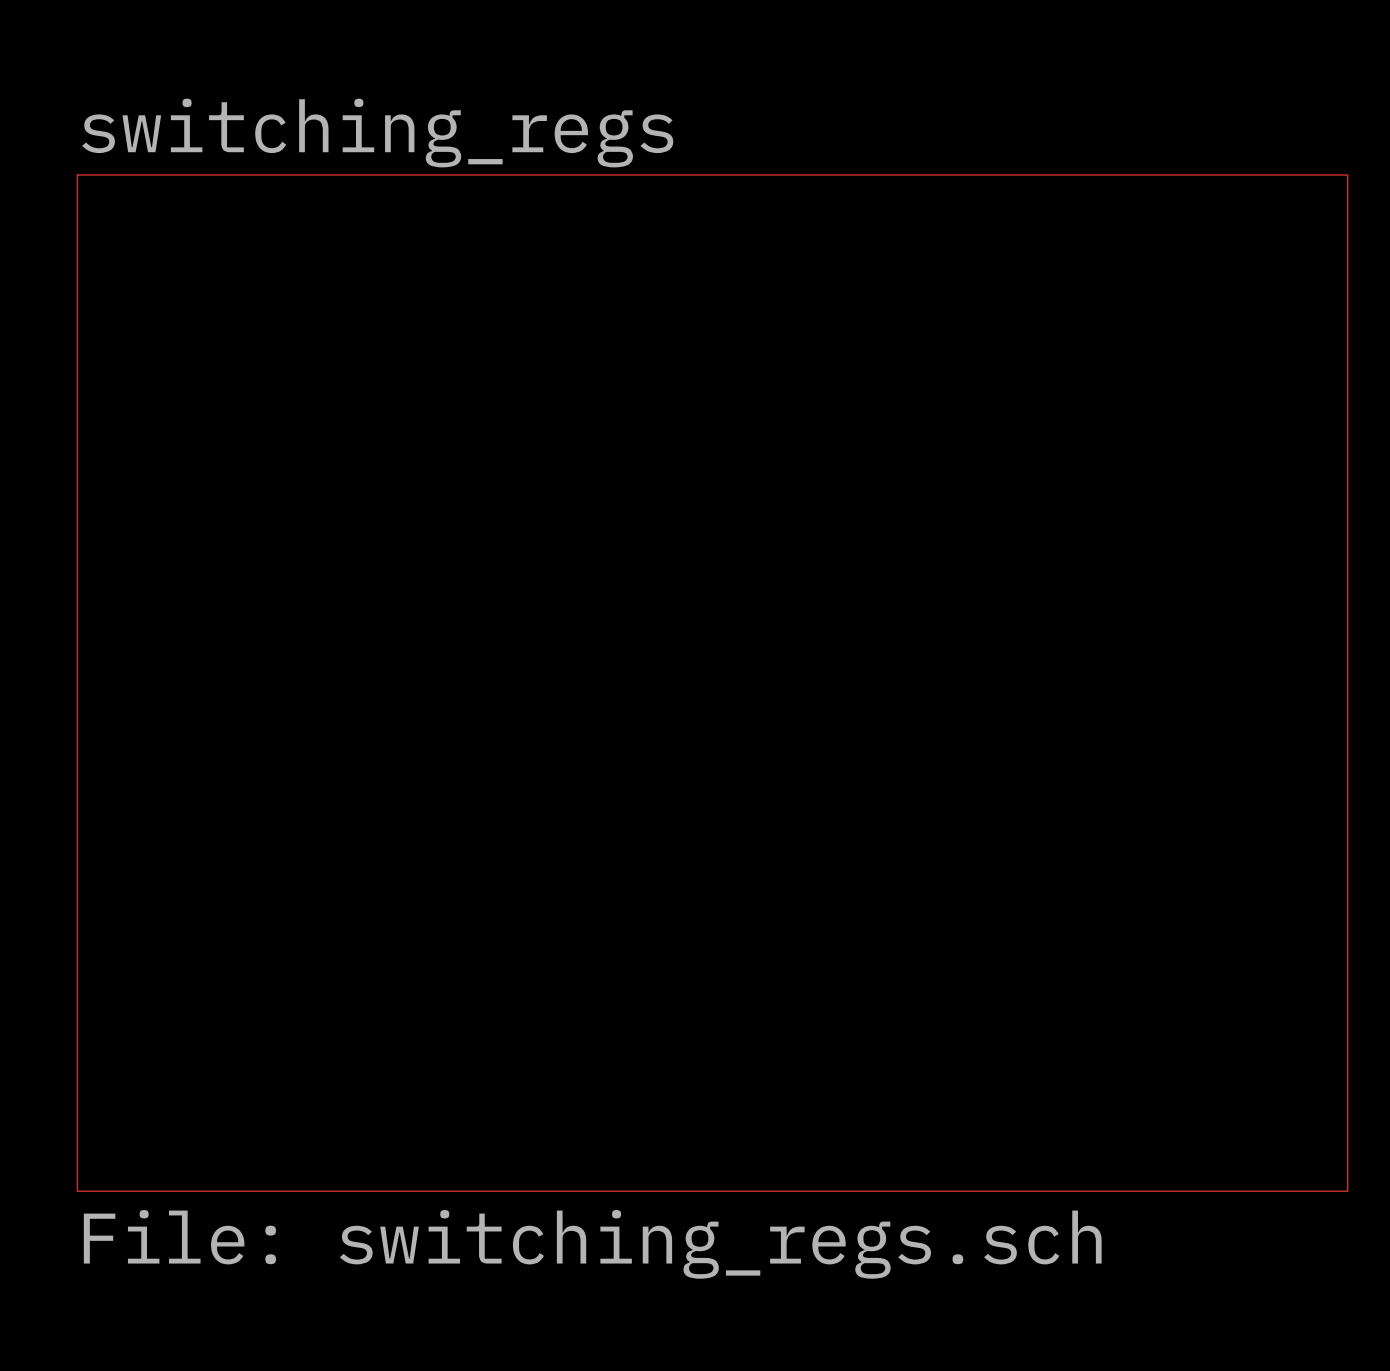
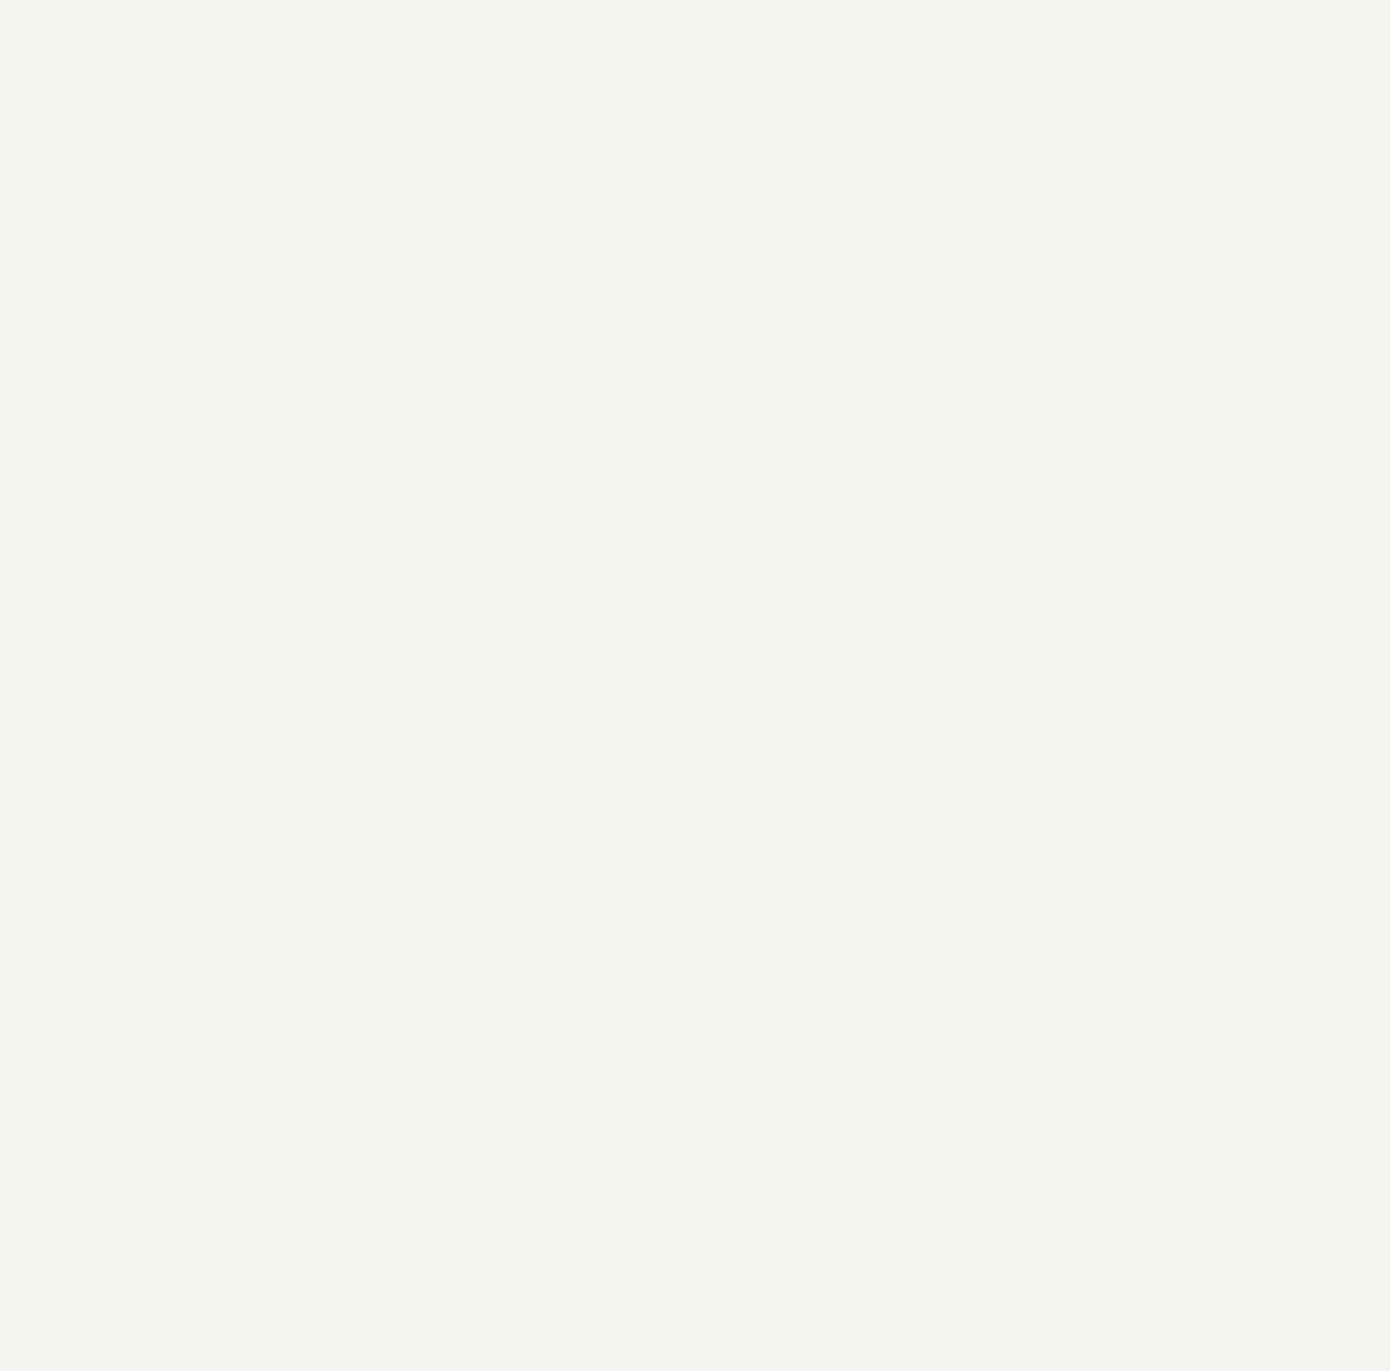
sheet switching_regs: File: switching_regs.sch (712, 683) -> none

